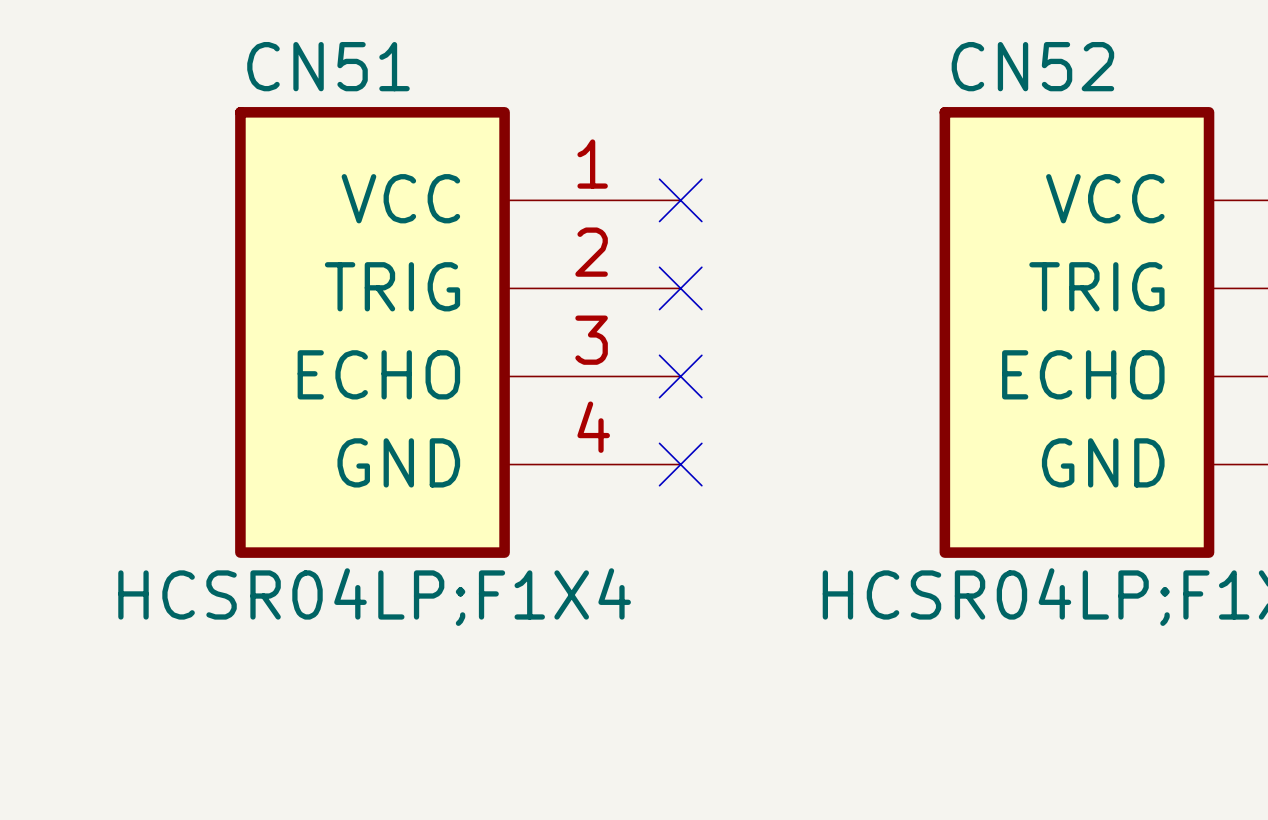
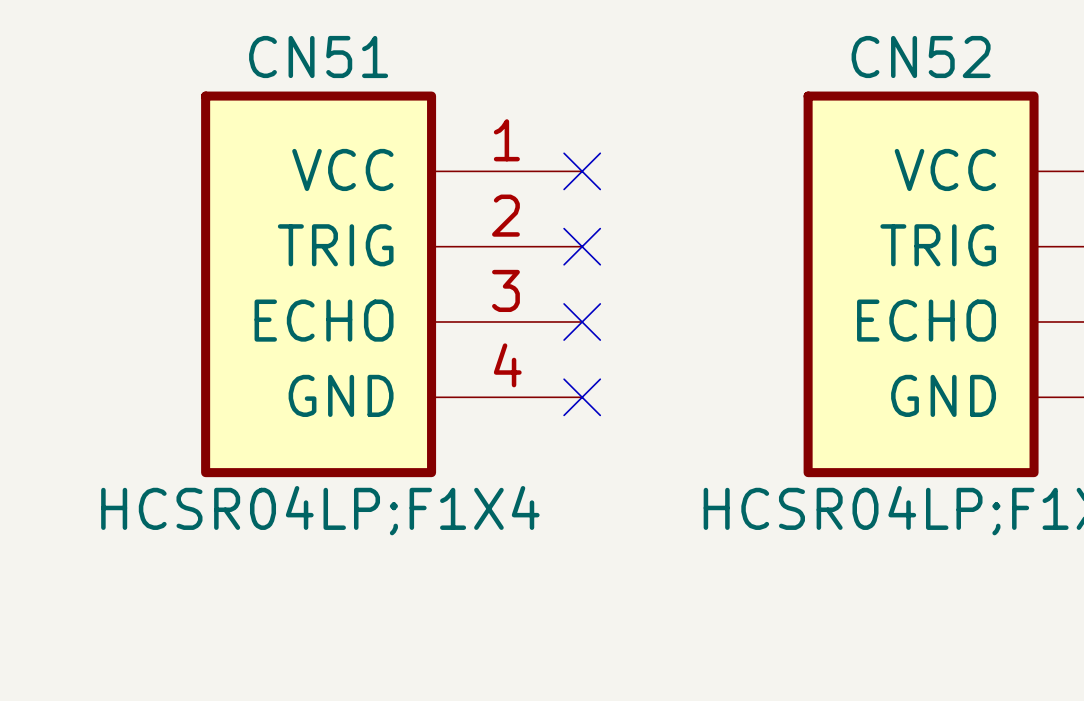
CN51 name position: CN51 (328, 66) -> CN51 (318, 57)
CN52 name position: CN52 (1032, 66) -> CN52 (921, 57)

